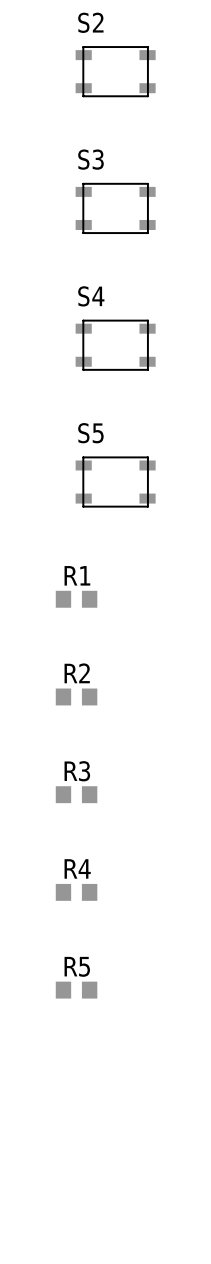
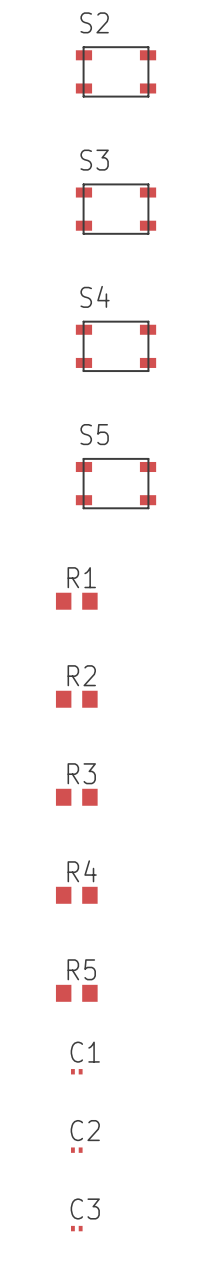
C1: none -> (76, 1071)
C2: none -> (76, 1150)
C3: none -> (76, 1228)

